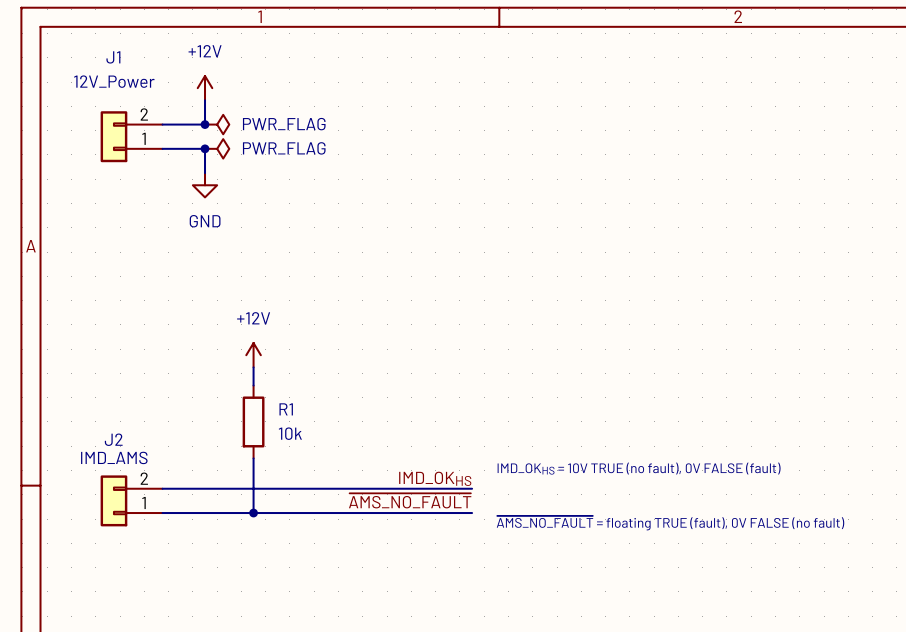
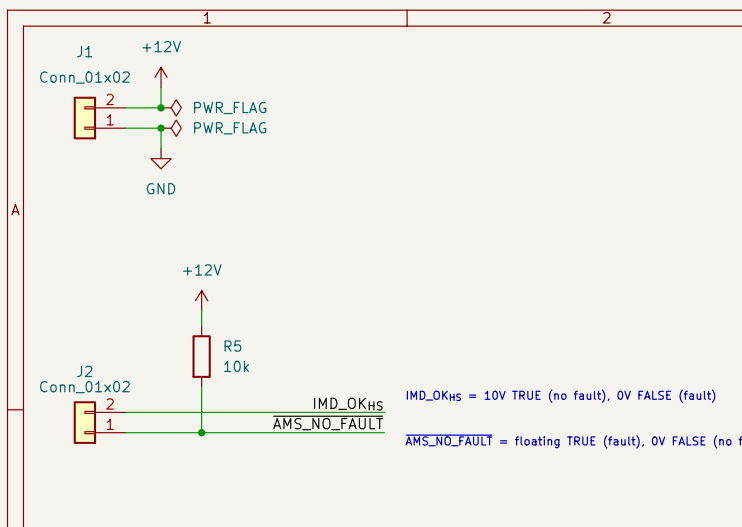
J1 value: 12V_Power (114, 81) -> Conn_01x02 (84, 77)
R1 name: R1 (286, 409) -> R5 (232, 346)
J2 value: IMD_AMS (114, 457) -> Conn_01x02 (84, 387)

